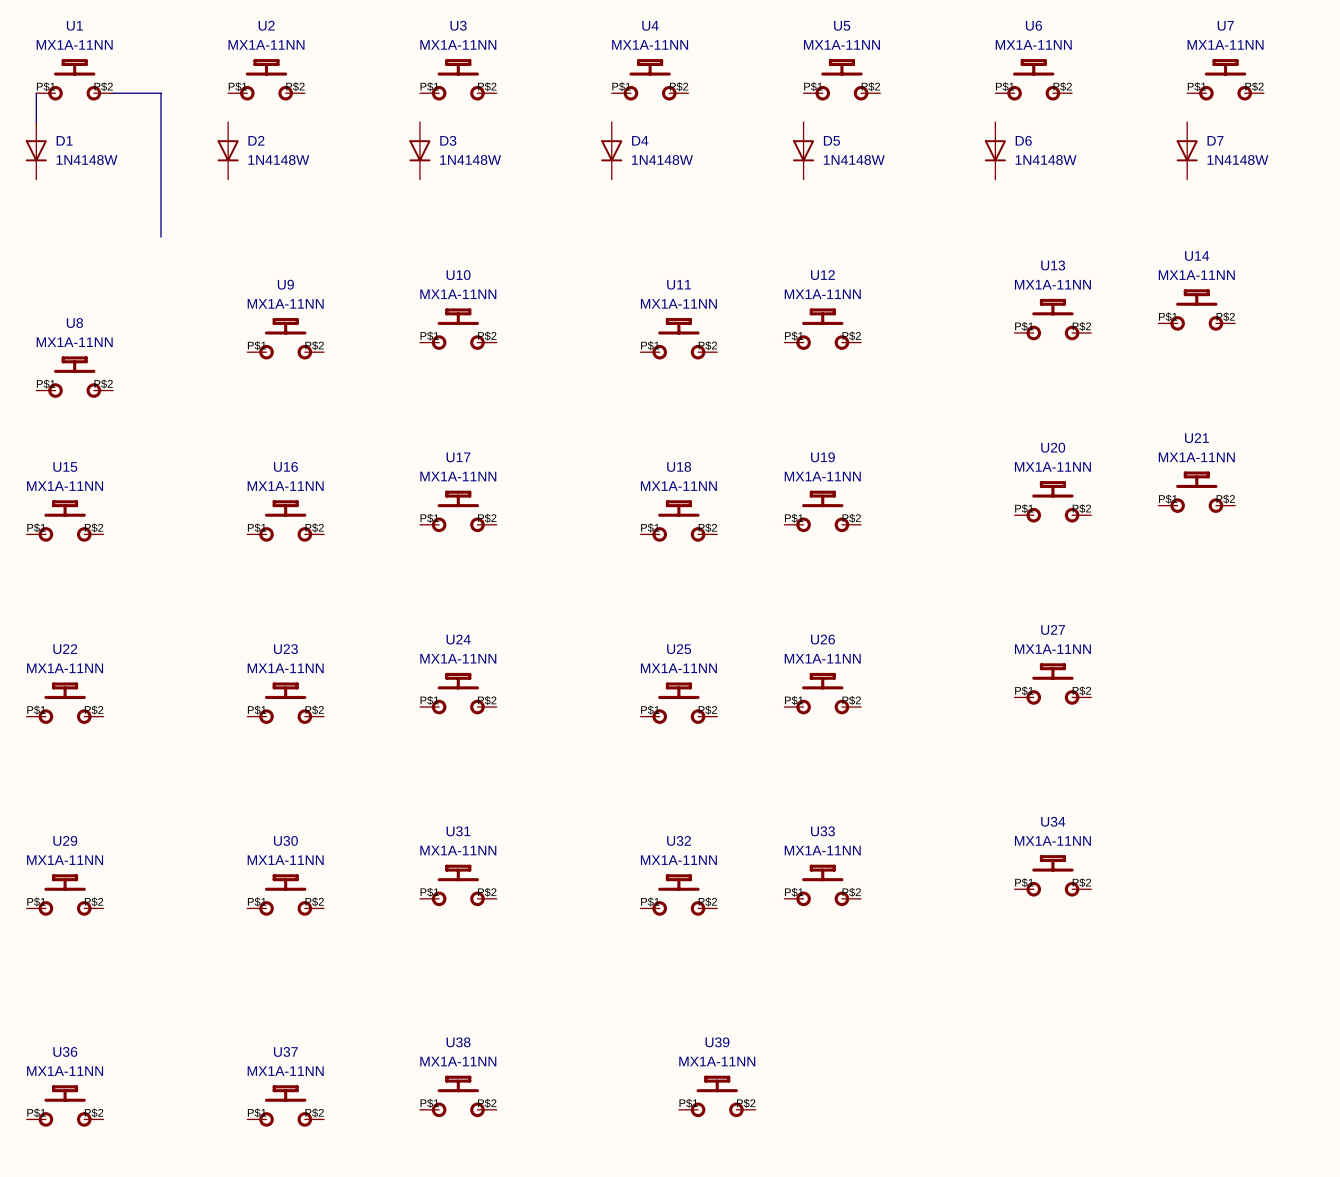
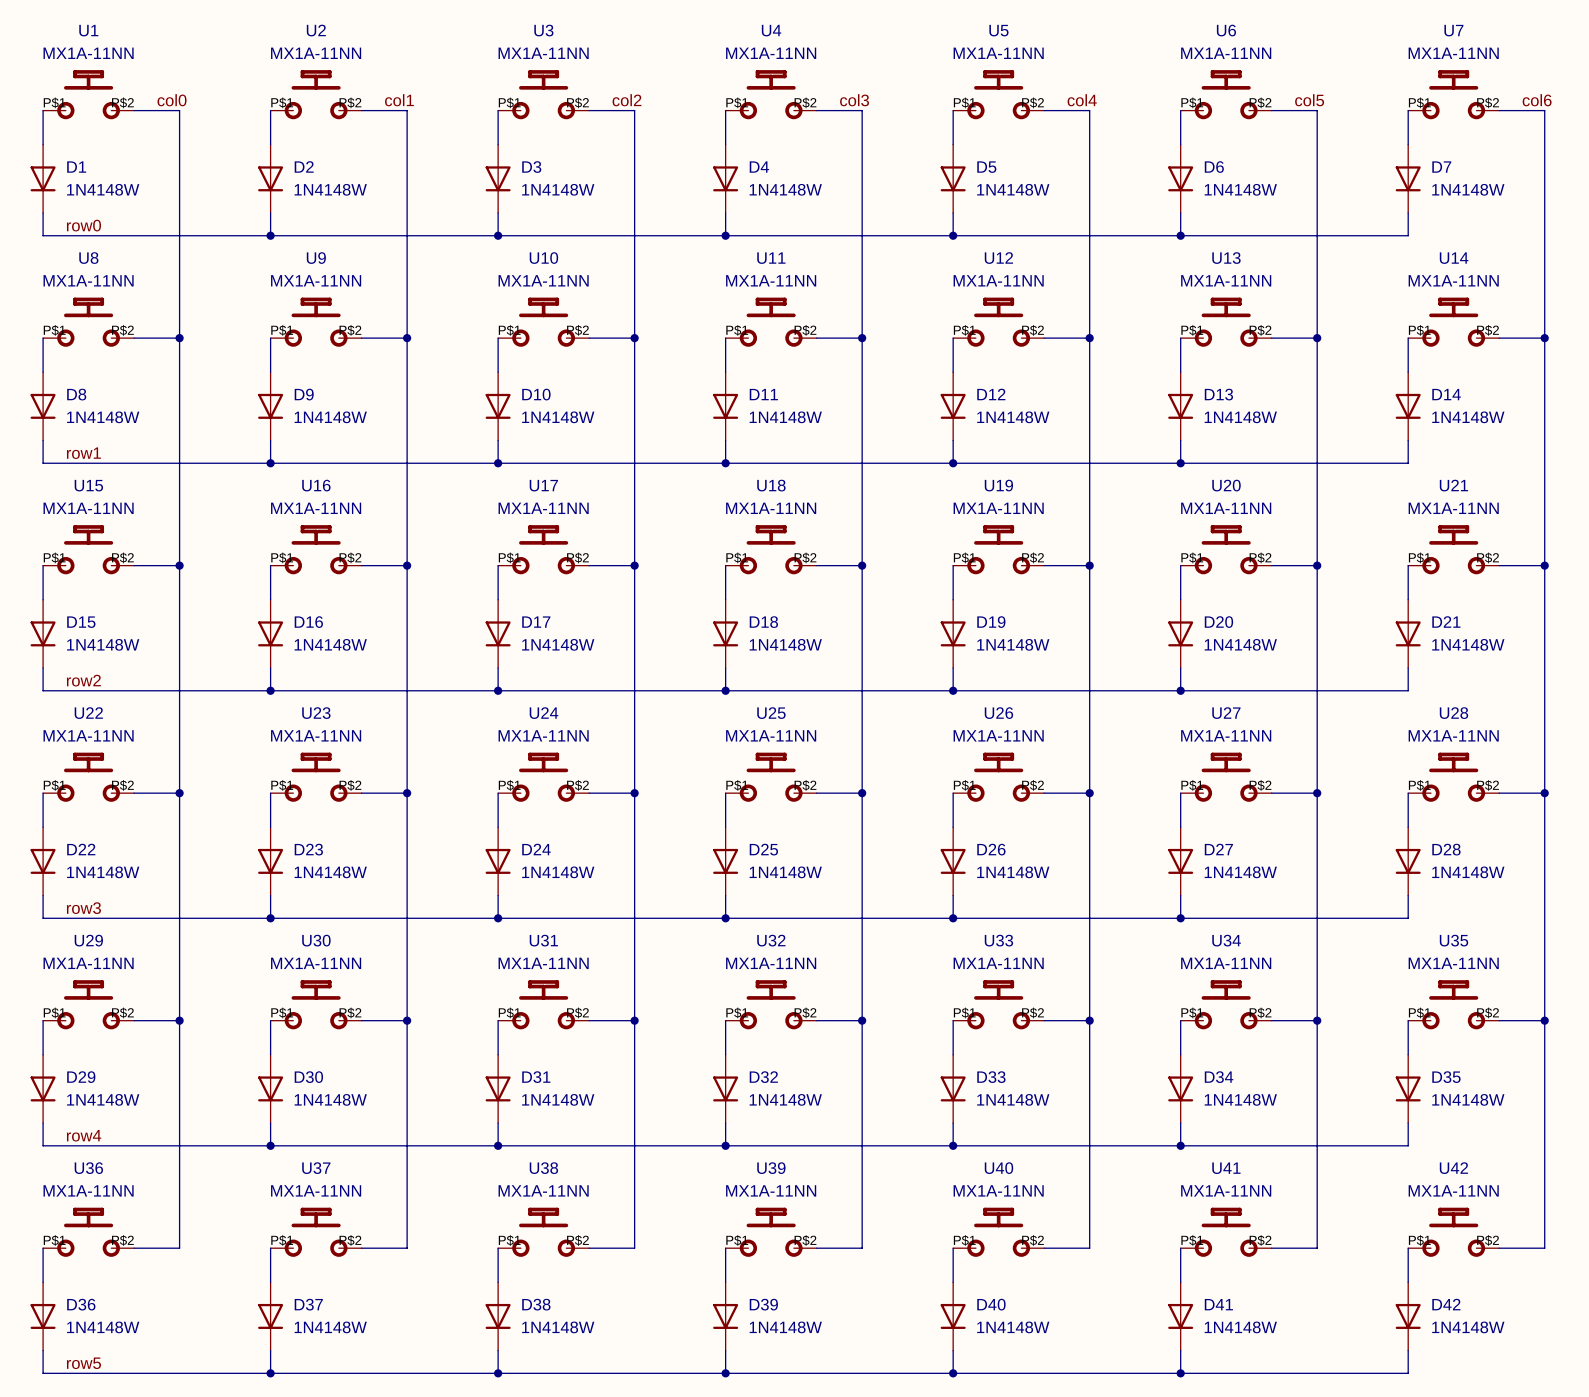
label: none -> col0 (172, 100)
label: none -> col1 (399, 100)
label: none -> col2 (626, 100)
label: none -> col3 (854, 100)
label: none -> col4 (1082, 100)
label: none -> col5 (1309, 100)
label: none -> col6 (1537, 100)
wire: (151, 93) (160, 93) (160, 237) -> (179, 110) (179, 1248) (134, 1248)
wire: none -> (270, 110) (270, 144)
wire: none -> (361, 110) (407, 110) (407, 1248) (361, 1248)
wire: none -> (498, 110) (498, 144)
wire: none -> (589, 110) (634, 110) (634, 1248) (589, 1248)
wire: none -> (725, 110) (725, 144)
wire: none -> (816, 110) (862, 110) (862, 1248) (816, 1248)
wire: none -> (953, 110) (953, 144)
wire: none -> (1044, 110) (1089, 110) (1089, 1248) (1044, 1248)
wire: none -> (1180, 110) (1180, 144)
wire: none -> (1271, 110) (1317, 110) (1317, 1248) (1271, 1248)
wire: none -> (1408, 110) (1408, 144)
wire: none -> (1499, 110) (1544, 110) (1544, 1248) (1499, 1248)
wire: none -> (43, 212) (43, 235) (1408, 235) (1408, 212)
wire: none -> (270, 212) (270, 235)
wire: none -> (498, 212) (498, 235)
wire: none -> (725, 212) (725, 235)
wire: none -> (953, 212) (953, 235)
wire: none -> (1180, 212) (1180, 235)
label: none -> row0 (83, 225)
junction: none -> (270, 235)
junction: none -> (498, 235)
junction: none -> (725, 235)
junction: none -> (953, 235)
junction: none -> (1180, 235)
wire: none -> (43, 338) (43, 372)
wire: none -> (134, 338) (179, 338)
junction: none -> (179, 338)
wire: none -> (270, 338) (270, 372)
wire: none -> (361, 338) (407, 338)
junction: none -> (407, 338)
wire: none -> (498, 338) (498, 372)
wire: none -> (589, 338) (634, 338)
junction: none -> (634, 338)
wire: none -> (725, 338) (725, 372)
wire: none -> (816, 338) (862, 338)
junction: none -> (862, 338)
wire: none -> (953, 338) (953, 372)
wire: none -> (1044, 338) (1089, 338)
junction: none -> (1089, 338)
wire: none -> (1180, 338) (1180, 372)
wire: none -> (1271, 338) (1317, 338)
junction: none -> (1317, 338)
wire: none -> (1408, 338) (1408, 372)
wire: none -> (1499, 338) (1544, 338)
junction: none -> (1544, 338)
U14 position: (1196, 309) -> (1453, 322)
U13 position: (1052, 319) -> (1226, 322)
U10 position: (458, 329) -> (543, 322)
U12 position: (822, 329) -> (998, 322)
U9 position: (285, 338) -> (316, 322)
U11 position: (678, 338) -> (771, 322)
D8: none -> 1N4148W (43, 406)
D9: none -> 1N4148W (270, 406)
D10: none -> 1N4148W (498, 406)
D11: none -> 1N4148W (725, 406)
D12: none -> 1N4148W (953, 406)
D13: none -> 1N4148W (1180, 406)
D14: none -> 1N4148W (1408, 406)
wire: none -> (43, 440) (43, 463) (1408, 463) (1408, 440)
wire: none -> (270, 440) (270, 463)
wire: none -> (498, 440) (498, 463)
wire: none -> (725, 440) (725, 463)
wire: none -> (953, 440) (953, 463)
wire: none -> (1180, 440) (1180, 463)
U8 position: (74, 377) -> (88, 322)
label: none -> row1 (83, 453)
junction: none -> (270, 463)
junction: none -> (498, 463)
junction: none -> (725, 463)
junction: none -> (953, 463)
junction: none -> (1180, 463)
wire: none -> (43, 565) (43, 599)
wire: none -> (134, 565) (179, 565)
junction: none -> (179, 565)
wire: none -> (270, 565) (270, 599)
wire: none -> (361, 565) (407, 565)
junction: none -> (407, 565)
wire: none -> (498, 565) (498, 599)
wire: none -> (589, 565) (634, 565)
junction: none -> (634, 565)
wire: none -> (725, 565) (725, 599)
wire: none -> (816, 565) (862, 565)
junction: none -> (862, 565)
wire: none -> (953, 565) (953, 599)
wire: none -> (1044, 565) (1089, 565)
junction: none -> (1089, 565)
wire: none -> (1180, 565) (1180, 599)
wire: none -> (1271, 565) (1317, 565)
junction: none -> (1317, 565)
wire: none -> (1408, 565) (1408, 599)
wire: none -> (1499, 565) (1544, 565)
junction: none -> (1544, 565)
U21 position: (1196, 492) -> (1453, 549)
U20 position: (1052, 501) -> (1226, 549)
U17 position: (458, 511) -> (543, 549)
U19 position: (822, 511) -> (998, 549)
U15 position: (65, 520) -> (88, 549)
U16 position: (285, 520) -> (316, 549)
U18 position: (678, 520) -> (771, 549)
D15: none -> 1N4148W (43, 633)
D16: none -> 1N4148W (270, 633)
D17: none -> 1N4148W (498, 633)
D18: none -> 1N4148W (725, 633)
D19: none -> 1N4148W (953, 633)
D20: none -> 1N4148W (1180, 633)
D21: none -> 1N4148W (1408, 633)
wire: none -> (43, 668) (43, 690) (1408, 690) (1408, 668)
wire: none -> (270, 668) (270, 690)
wire: none -> (498, 668) (498, 690)
wire: none -> (725, 668) (725, 690)
wire: none -> (953, 668) (953, 690)
wire: none -> (1180, 668) (1180, 690)
label: none -> row2 (83, 680)
junction: none -> (270, 690)
junction: none -> (498, 690)
junction: none -> (725, 690)
junction: none -> (953, 690)
junction: none -> (1180, 690)
U28: none -> MX1A-11NN (1453, 777)
wire: none -> (43, 793) (43, 827)
wire: none -> (134, 793) (179, 793)
junction: none -> (179, 793)
wire: none -> (270, 793) (270, 827)
wire: none -> (361, 793) (407, 793)
junction: none -> (407, 793)
wire: none -> (498, 793) (498, 827)
wire: none -> (589, 793) (634, 793)
junction: none -> (634, 793)
wire: none -> (725, 793) (725, 827)
wire: none -> (816, 793) (862, 793)
junction: none -> (862, 793)
wire: none -> (953, 793) (953, 827)
wire: none -> (1044, 793) (1089, 793)
junction: none -> (1089, 793)
wire: none -> (1180, 793) (1180, 827)
wire: none -> (1271, 793) (1317, 793)
junction: none -> (1317, 793)
wire: none -> (1408, 793) (1408, 827)
wire: none -> (1499, 793) (1544, 793)
junction: none -> (1544, 793)
U27 position: (1052, 684) -> (1226, 777)
U24 position: (458, 693) -> (543, 777)
U26 position: (822, 693) -> (998, 777)
U22 position: (65, 703) -> (88, 777)
U23 position: (285, 703) -> (316, 777)
U25 position: (678, 703) -> (771, 777)
D22: none -> 1N4148W (43, 861)
D23: none -> 1N4148W (270, 861)
D24: none -> 1N4148W (498, 861)
D25: none -> 1N4148W (725, 861)
D26: none -> 1N4148W (953, 861)
D27: none -> 1N4148W (1180, 861)
D28: none -> 1N4148W (1408, 861)
wire: none -> (43, 895) (43, 918) (1408, 918) (1408, 895)
wire: none -> (270, 895) (270, 918)
wire: none -> (498, 895) (498, 918)
wire: none -> (725, 895) (725, 918)
wire: none -> (953, 895) (953, 918)
wire: none -> (1180, 895) (1180, 918)
label: none -> row3 (83, 908)
junction: none -> (270, 918)
junction: none -> (498, 918)
junction: none -> (725, 918)
junction: none -> (953, 918)
junction: none -> (1180, 918)
U35: none -> MX1A-11NN (1453, 1004)
wire: none -> (43, 1020) (43, 1054)
wire: none -> (134, 1020) (179, 1020)
junction: none -> (179, 1020)
wire: none -> (270, 1020) (270, 1054)
wire: none -> (361, 1020) (407, 1020)
junction: none -> (407, 1020)
wire: none -> (498, 1020) (498, 1054)
wire: none -> (589, 1020) (634, 1020)
junction: none -> (634, 1020)
wire: none -> (725, 1020) (725, 1054)
wire: none -> (816, 1020) (862, 1020)
junction: none -> (862, 1020)
wire: none -> (953, 1020) (953, 1054)
wire: none -> (1044, 1020) (1089, 1020)
junction: none -> (1089, 1020)
wire: none -> (1180, 1020) (1180, 1054)
wire: none -> (1271, 1020) (1317, 1020)
junction: none -> (1317, 1020)
wire: none -> (1408, 1020) (1408, 1054)
wire: none -> (1499, 1020) (1544, 1020)
junction: none -> (1544, 1020)
U34 position: (1052, 875) -> (1226, 1004)
U31 position: (458, 885) -> (543, 1004)
U33 position: (822, 885) -> (998, 1004)
U29 position: (65, 895) -> (88, 1004)
U30 position: (285, 895) -> (316, 1004)
U32 position: (678, 895) -> (771, 1004)
D29: none -> 1N4148W (43, 1088)
D30: none -> 1N4148W (270, 1088)
D31: none -> 1N4148W (498, 1088)
D32: none -> 1N4148W (725, 1088)
D33: none -> 1N4148W (953, 1088)
D34: none -> 1N4148W (1180, 1088)
D35: none -> 1N4148W (1408, 1088)
wire: none -> (43, 1123) (43, 1145) (1408, 1145) (1408, 1123)
wire: none -> (270, 1123) (270, 1145)
wire: none -> (498, 1123) (498, 1145)
wire: none -> (725, 1123) (725, 1145)
wire: none -> (953, 1123) (953, 1145)
wire: none -> (1180, 1123) (1180, 1145)
label: none -> row4 (84, 1135)
junction: none -> (270, 1145)
junction: none -> (498, 1145)
junction: none -> (725, 1145)
junction: none -> (953, 1145)
junction: none -> (1180, 1145)
U40: none -> MX1A-11NN (998, 1232)
U41: none -> MX1A-11NN (1226, 1232)
U42: none -> MX1A-11NN (1453, 1232)
wire: none -> (43, 1248) (43, 1282)
wire: none -> (270, 1248) (270, 1282)
wire: none -> (498, 1248) (498, 1282)
wire: none -> (725, 1248) (725, 1282)
wire: none -> (953, 1248) (953, 1282)
wire: none -> (1180, 1248) (1180, 1282)
wire: none -> (1408, 1248) (1408, 1282)
U38 position: (458, 1096) -> (543, 1232)
U39 position: (717, 1096) -> (771, 1232)
U36 position: (65, 1106) -> (88, 1232)
U37 position: (285, 1106) -> (316, 1232)
D36: none -> 1N4148W (43, 1316)
D37: none -> 1N4148W (270, 1316)
D38: none -> 1N4148W (498, 1316)
D39: none -> 1N4148W (725, 1316)
D40: none -> 1N4148W (953, 1316)
D41: none -> 1N4148W (1180, 1316)
D42: none -> 1N4148W (1408, 1316)
wire: none -> (43, 1350) (43, 1373) (1408, 1373) (1408, 1350)
wire: none -> (270, 1350) (270, 1373)
wire: none -> (498, 1350) (498, 1373)
wire: none -> (725, 1350) (725, 1373)
wire: none -> (953, 1350) (953, 1373)
wire: none -> (1180, 1350) (1180, 1373)
label: none -> row5 (83, 1363)
junction: none -> (270, 1373)
junction: none -> (498, 1373)
junction: none -> (725, 1373)
junction: none -> (953, 1373)
junction: none -> (1180, 1373)

